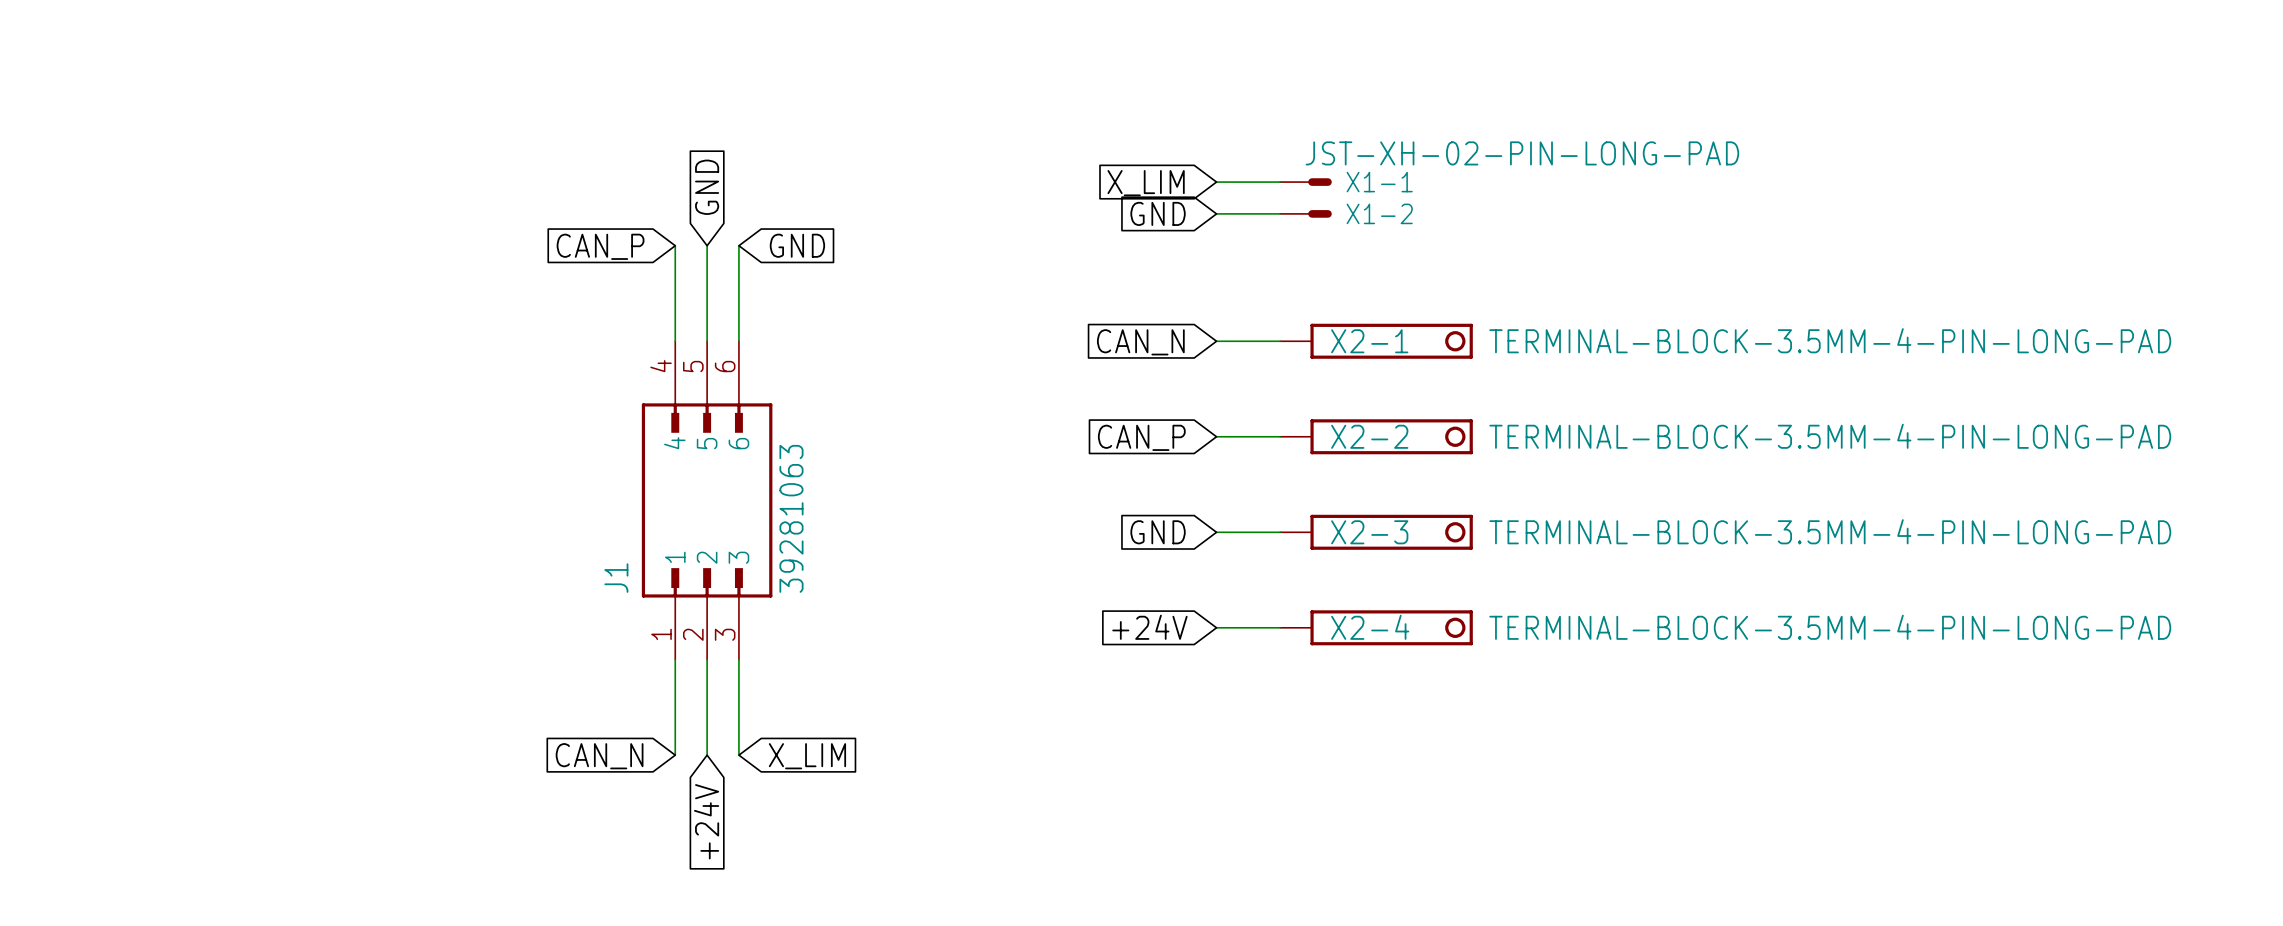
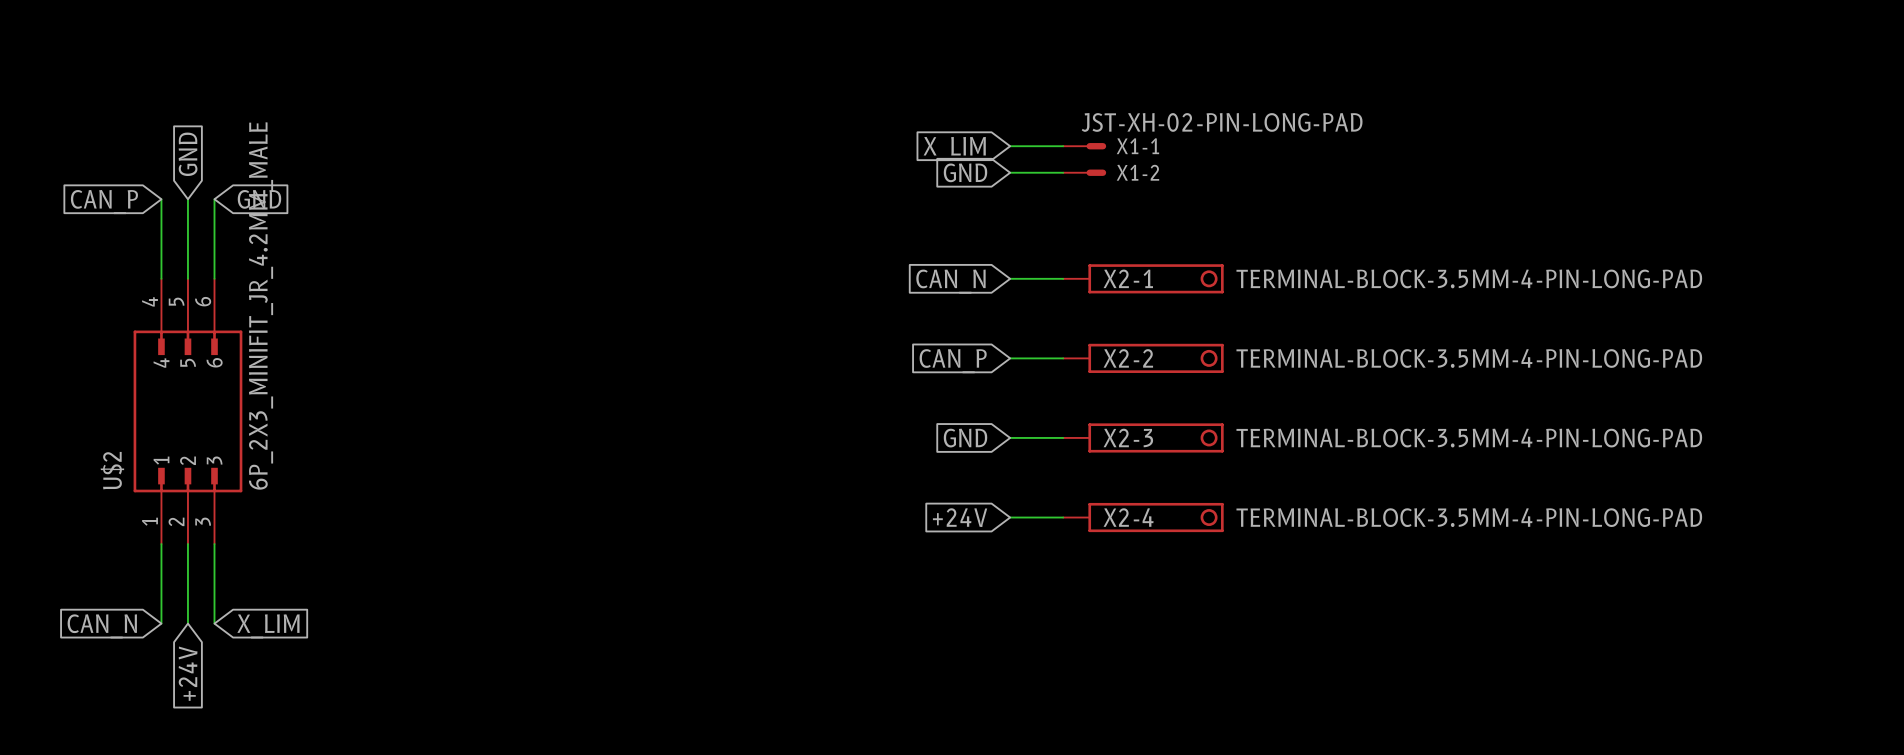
global label: none -> GND (188, 154)
global label: GND (707, 187) -> none
wire: none -> (161, 199) (161, 278)
wire: none -> (187, 199) (187, 278)
wire: none -> (214, 199) (214, 278)
global label: none -> GND (259, 199)
wire: (675, 245) (675, 341) -> none
wire: (707, 245) (707, 341) -> none
wire: (738, 245) (738, 341) -> none
global label: GND (797, 245) -> none
global label: none -> CAN_P (104, 202)
global label: CAN_P (600, 246) -> none
U$2: none -> 6P_2X3_MINIFIT_JR_4.2MM_MALE (187, 411)
J1: 39281063 (707, 500) -> none
wire: none -> (161, 544) (161, 623)
wire: none -> (187, 544) (187, 623)
wire: none -> (214, 544) (214, 623)
wire: (675, 659) (675, 755) -> none
wire: (707, 659) (707, 755) -> none
wire: (738, 659) (738, 755) -> none
global label: none -> CAN_N (102, 626)
global label: none -> X_LIM (268, 626)
global label: CAN_N (599, 756) -> none
global label: X_LIM (807, 756) -> none
global label: none -> +24V (188, 673)
global label: +24V (706, 821) -> none

